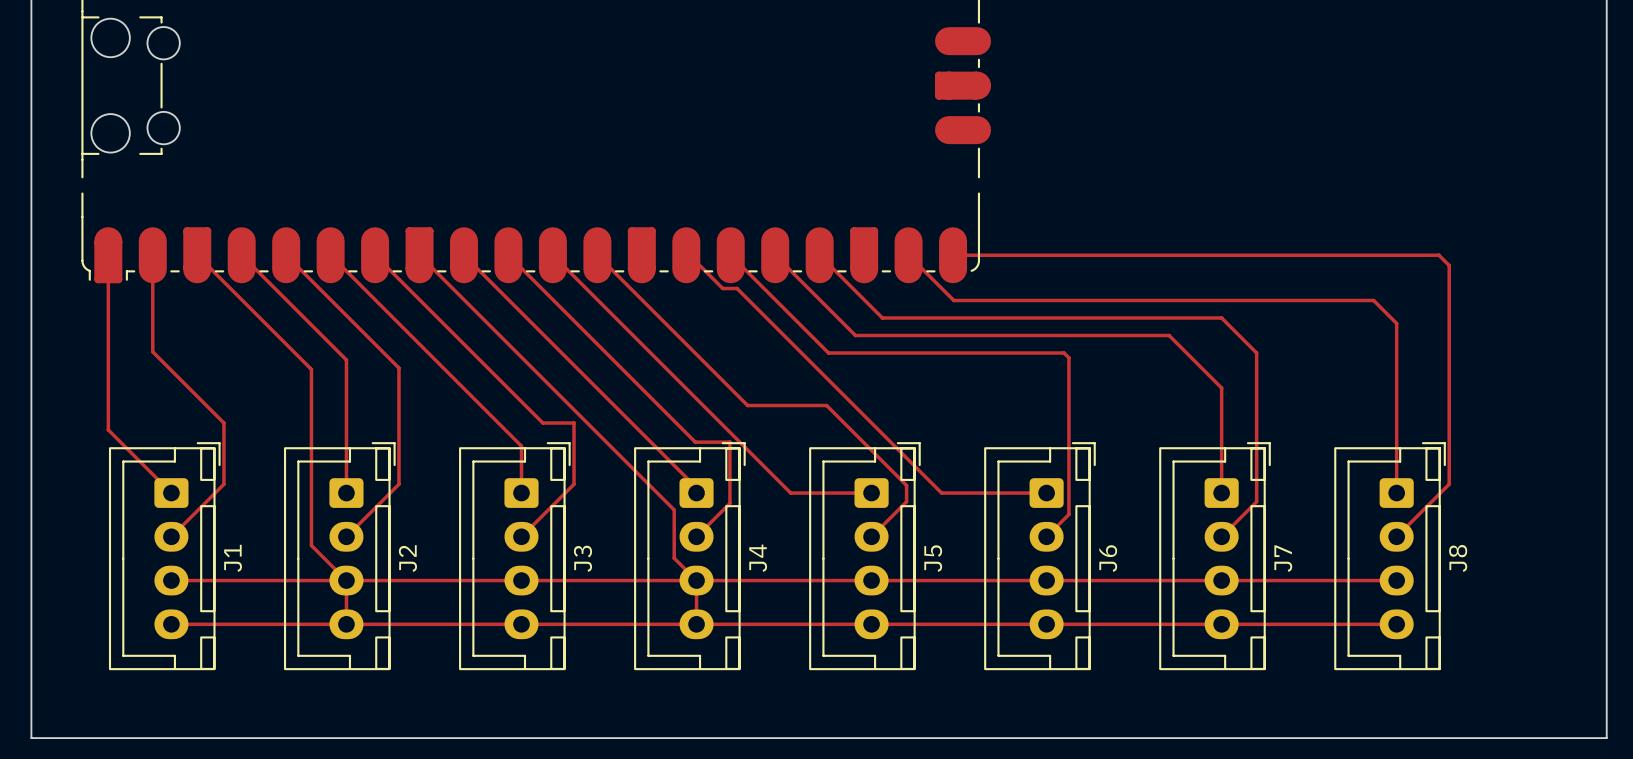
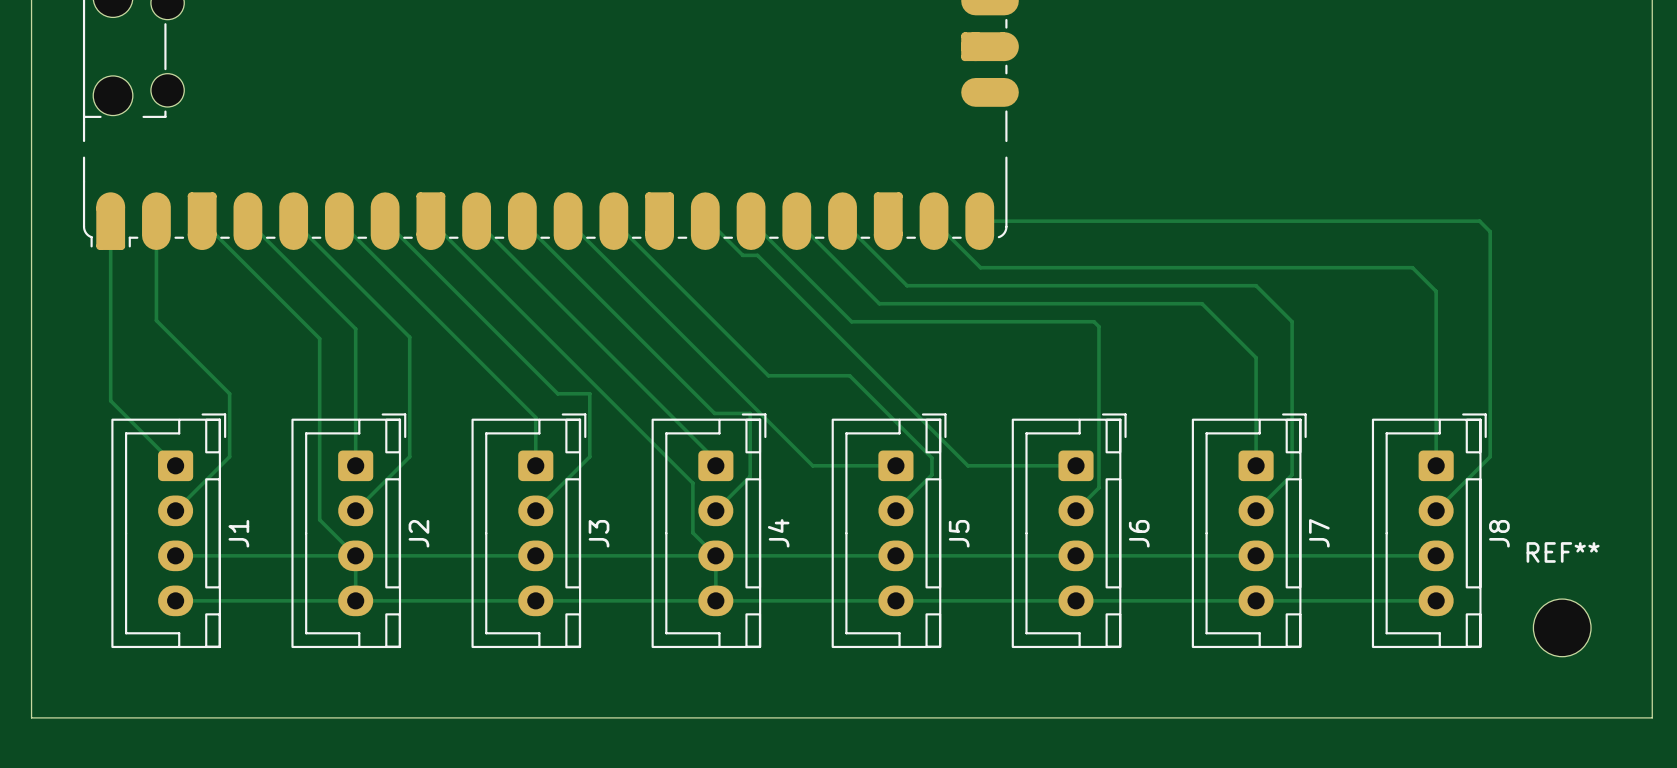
REF**: none -> (1562, 627)

